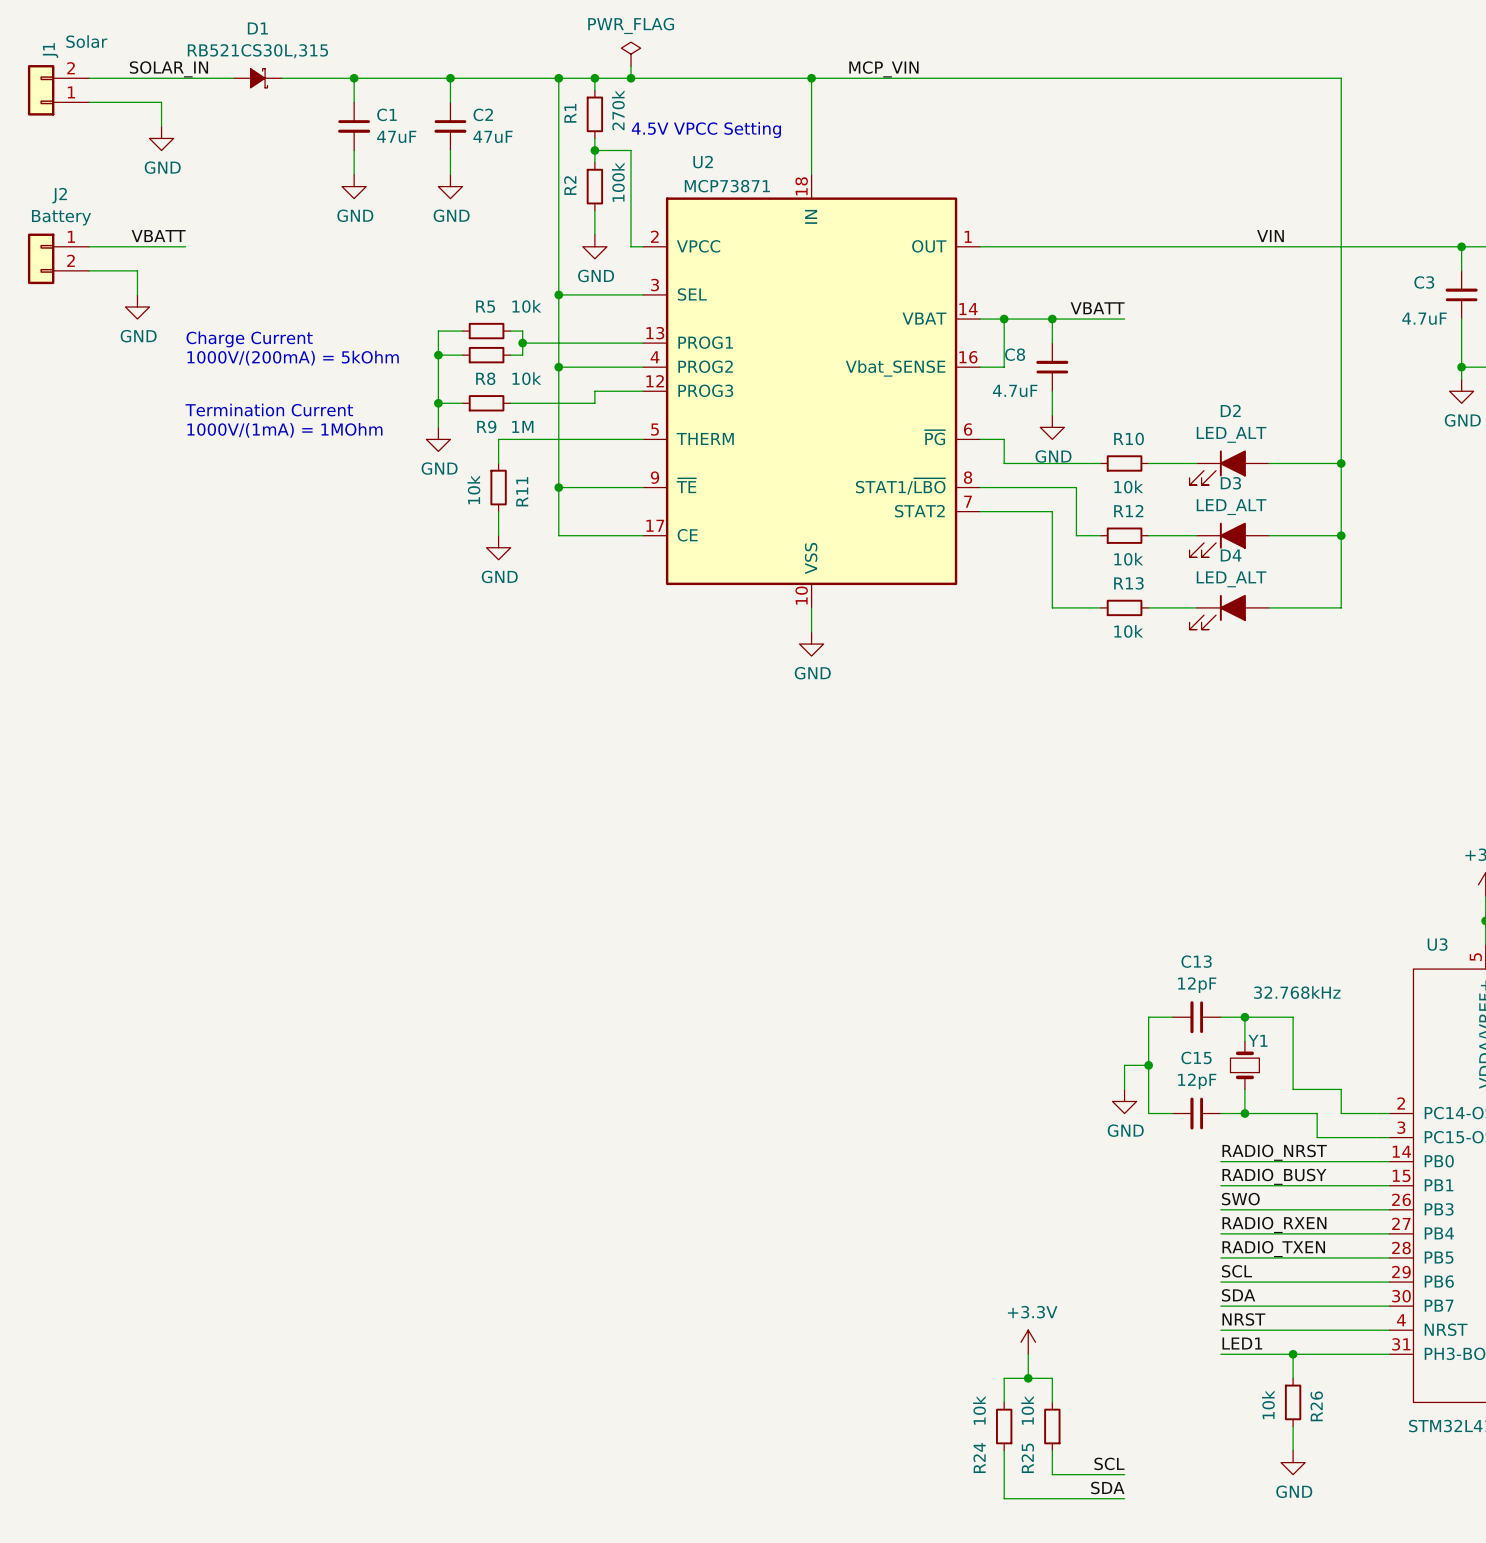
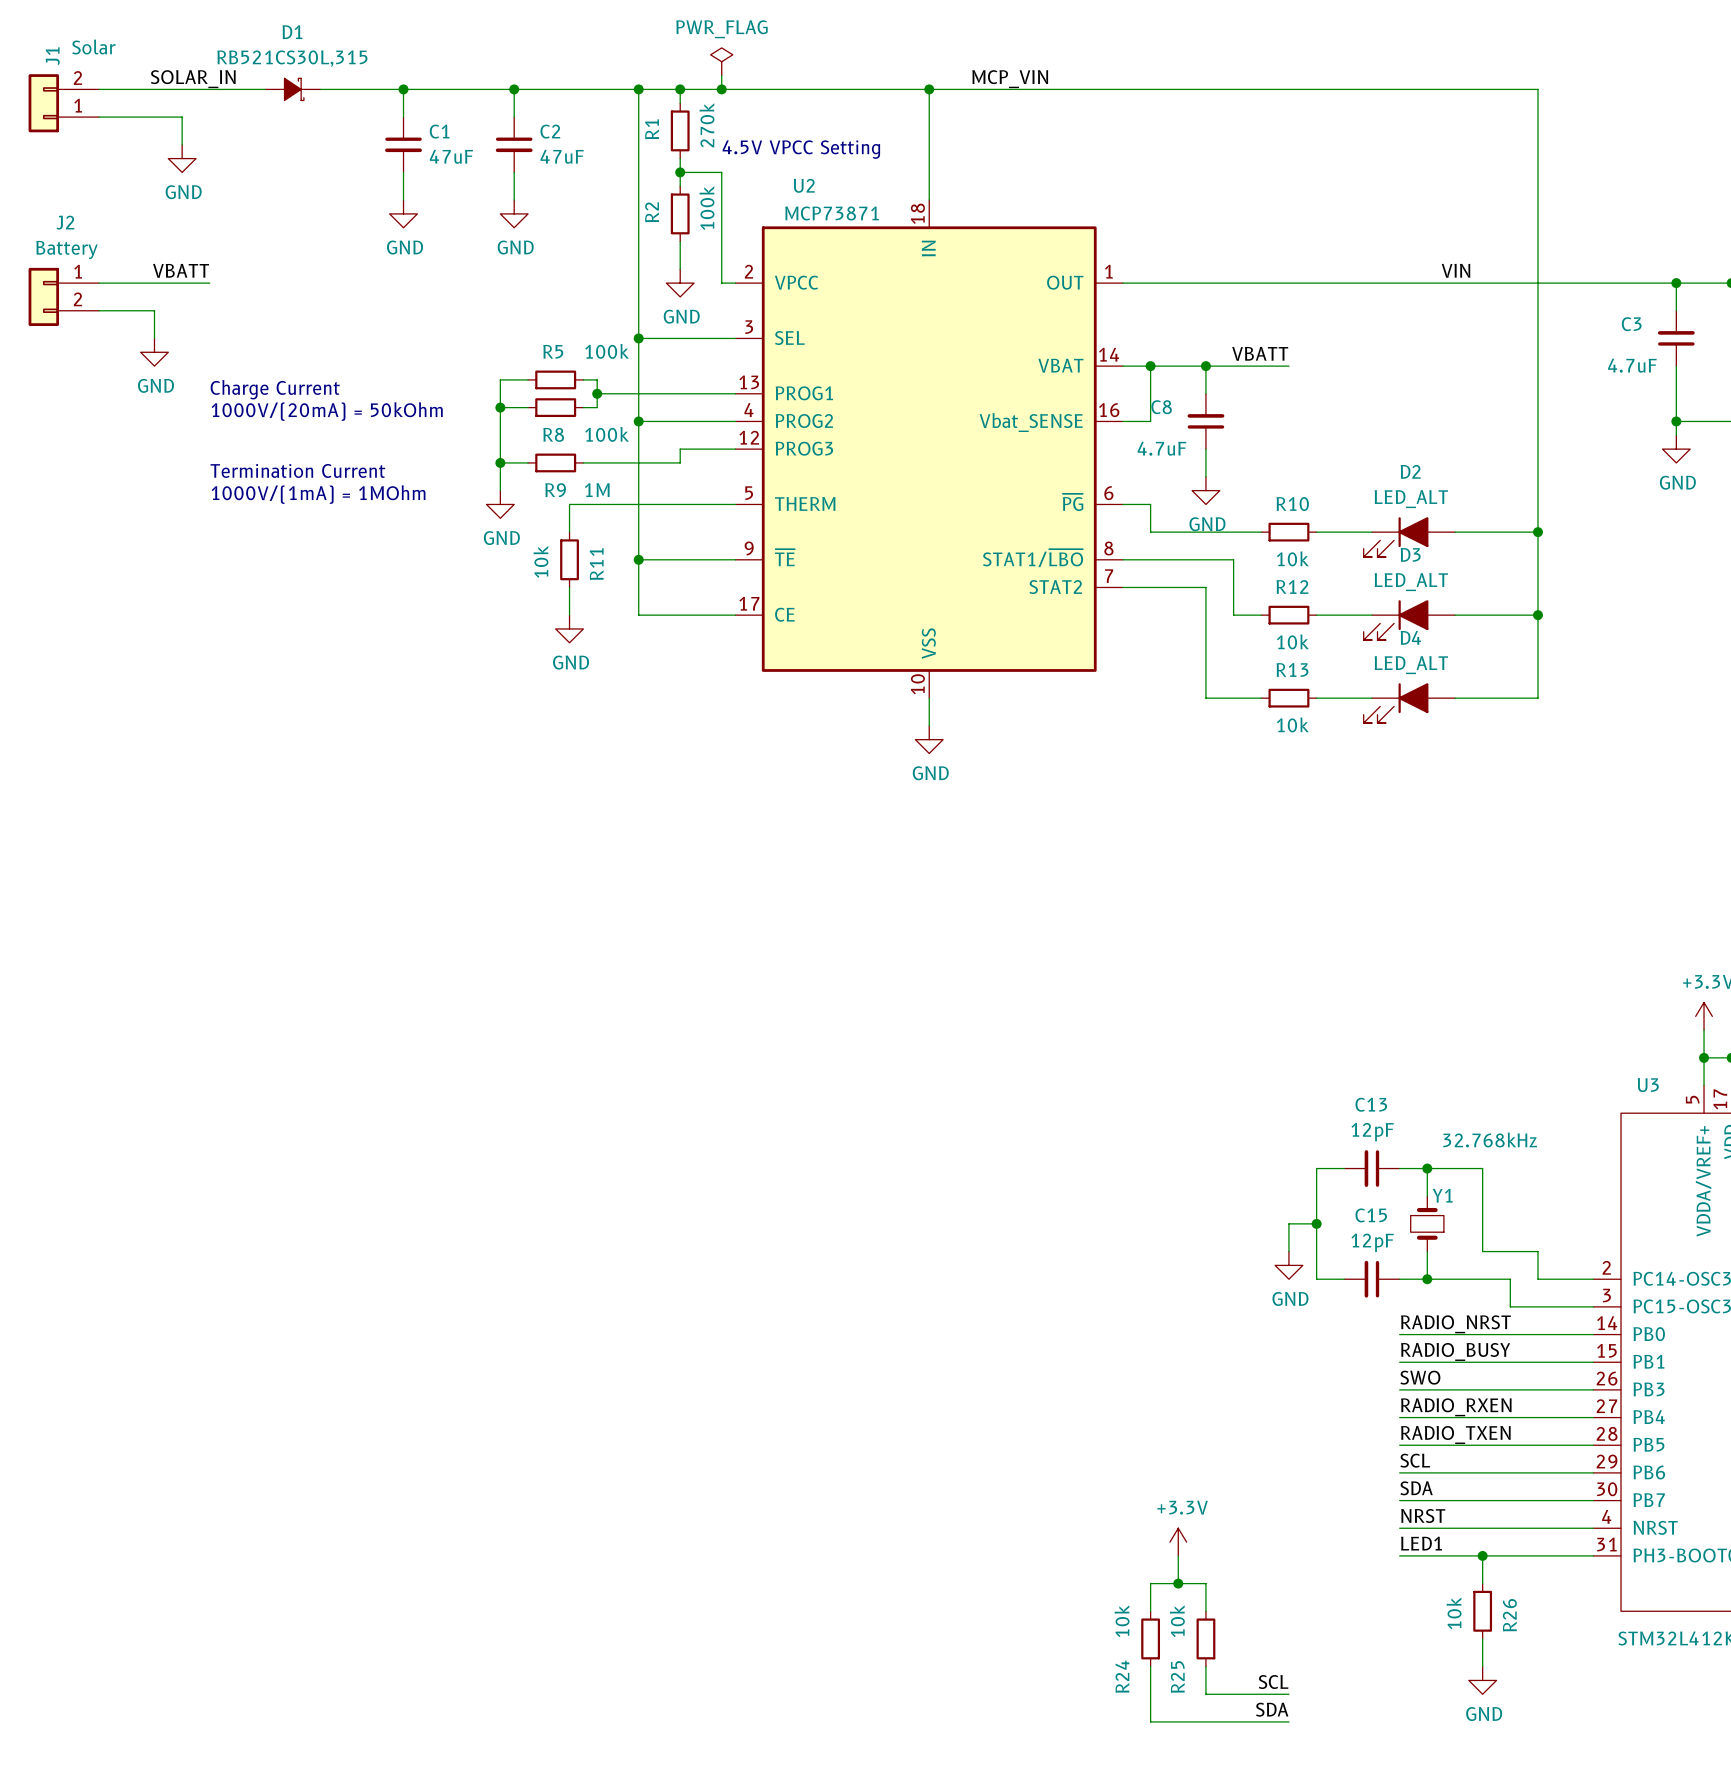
R5 value: 10k (526, 306) -> 100k (607, 351)
text: 1000V/(200mA) = 5kOhm (293, 358) -> 1000V/(20mA) = 50kOhm (327, 411)
R8 value: 10k (526, 378) -> 100k (607, 434)

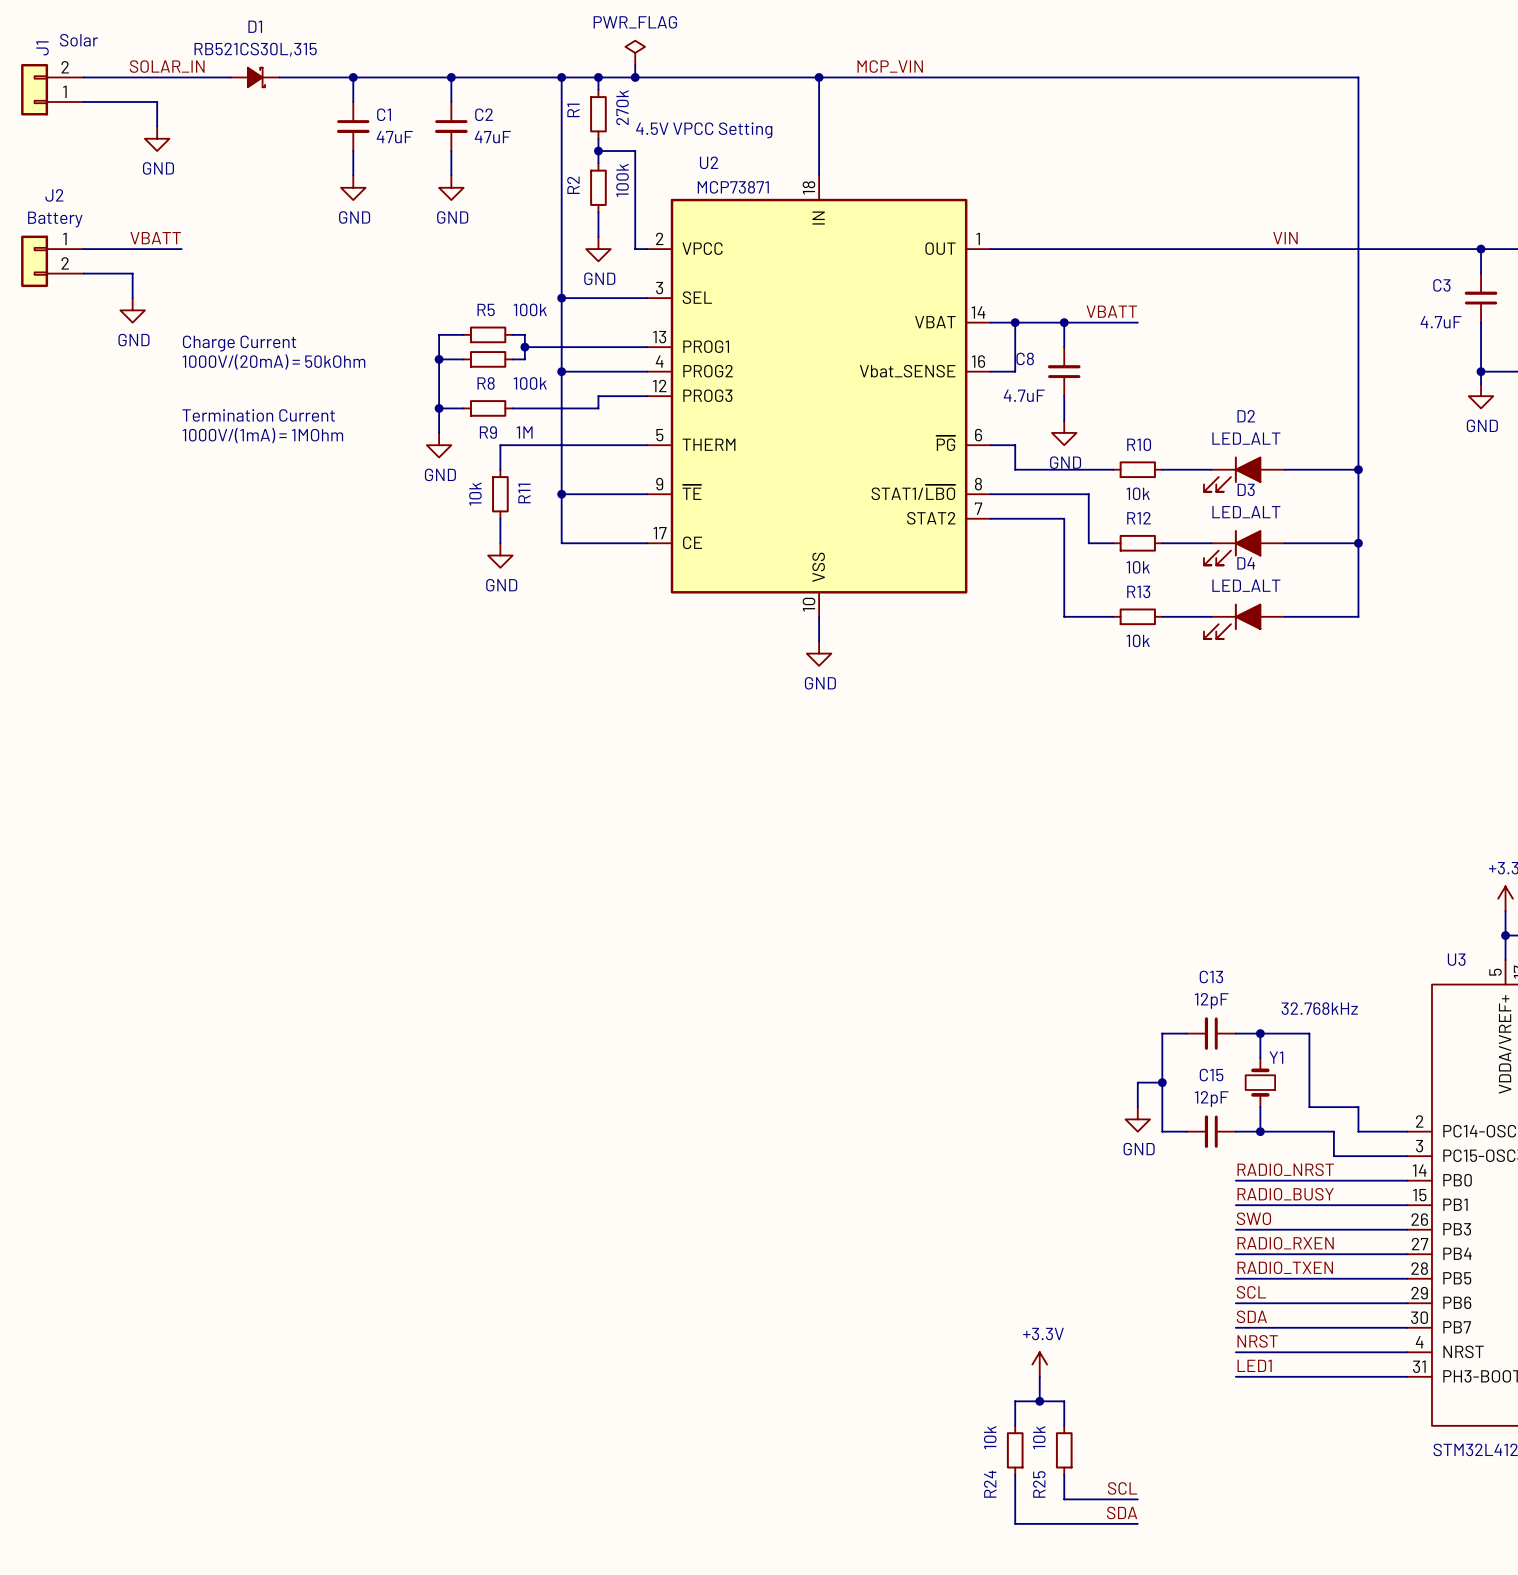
wire: (1482, 1555) (1482, 1583) -> none
junction: (1482, 1555) -> none
R26: 10k (1482, 1611) -> none
wire: (1482, 1638) (1482, 1666) -> none
power symbol: GND (1482, 1680) -> none

